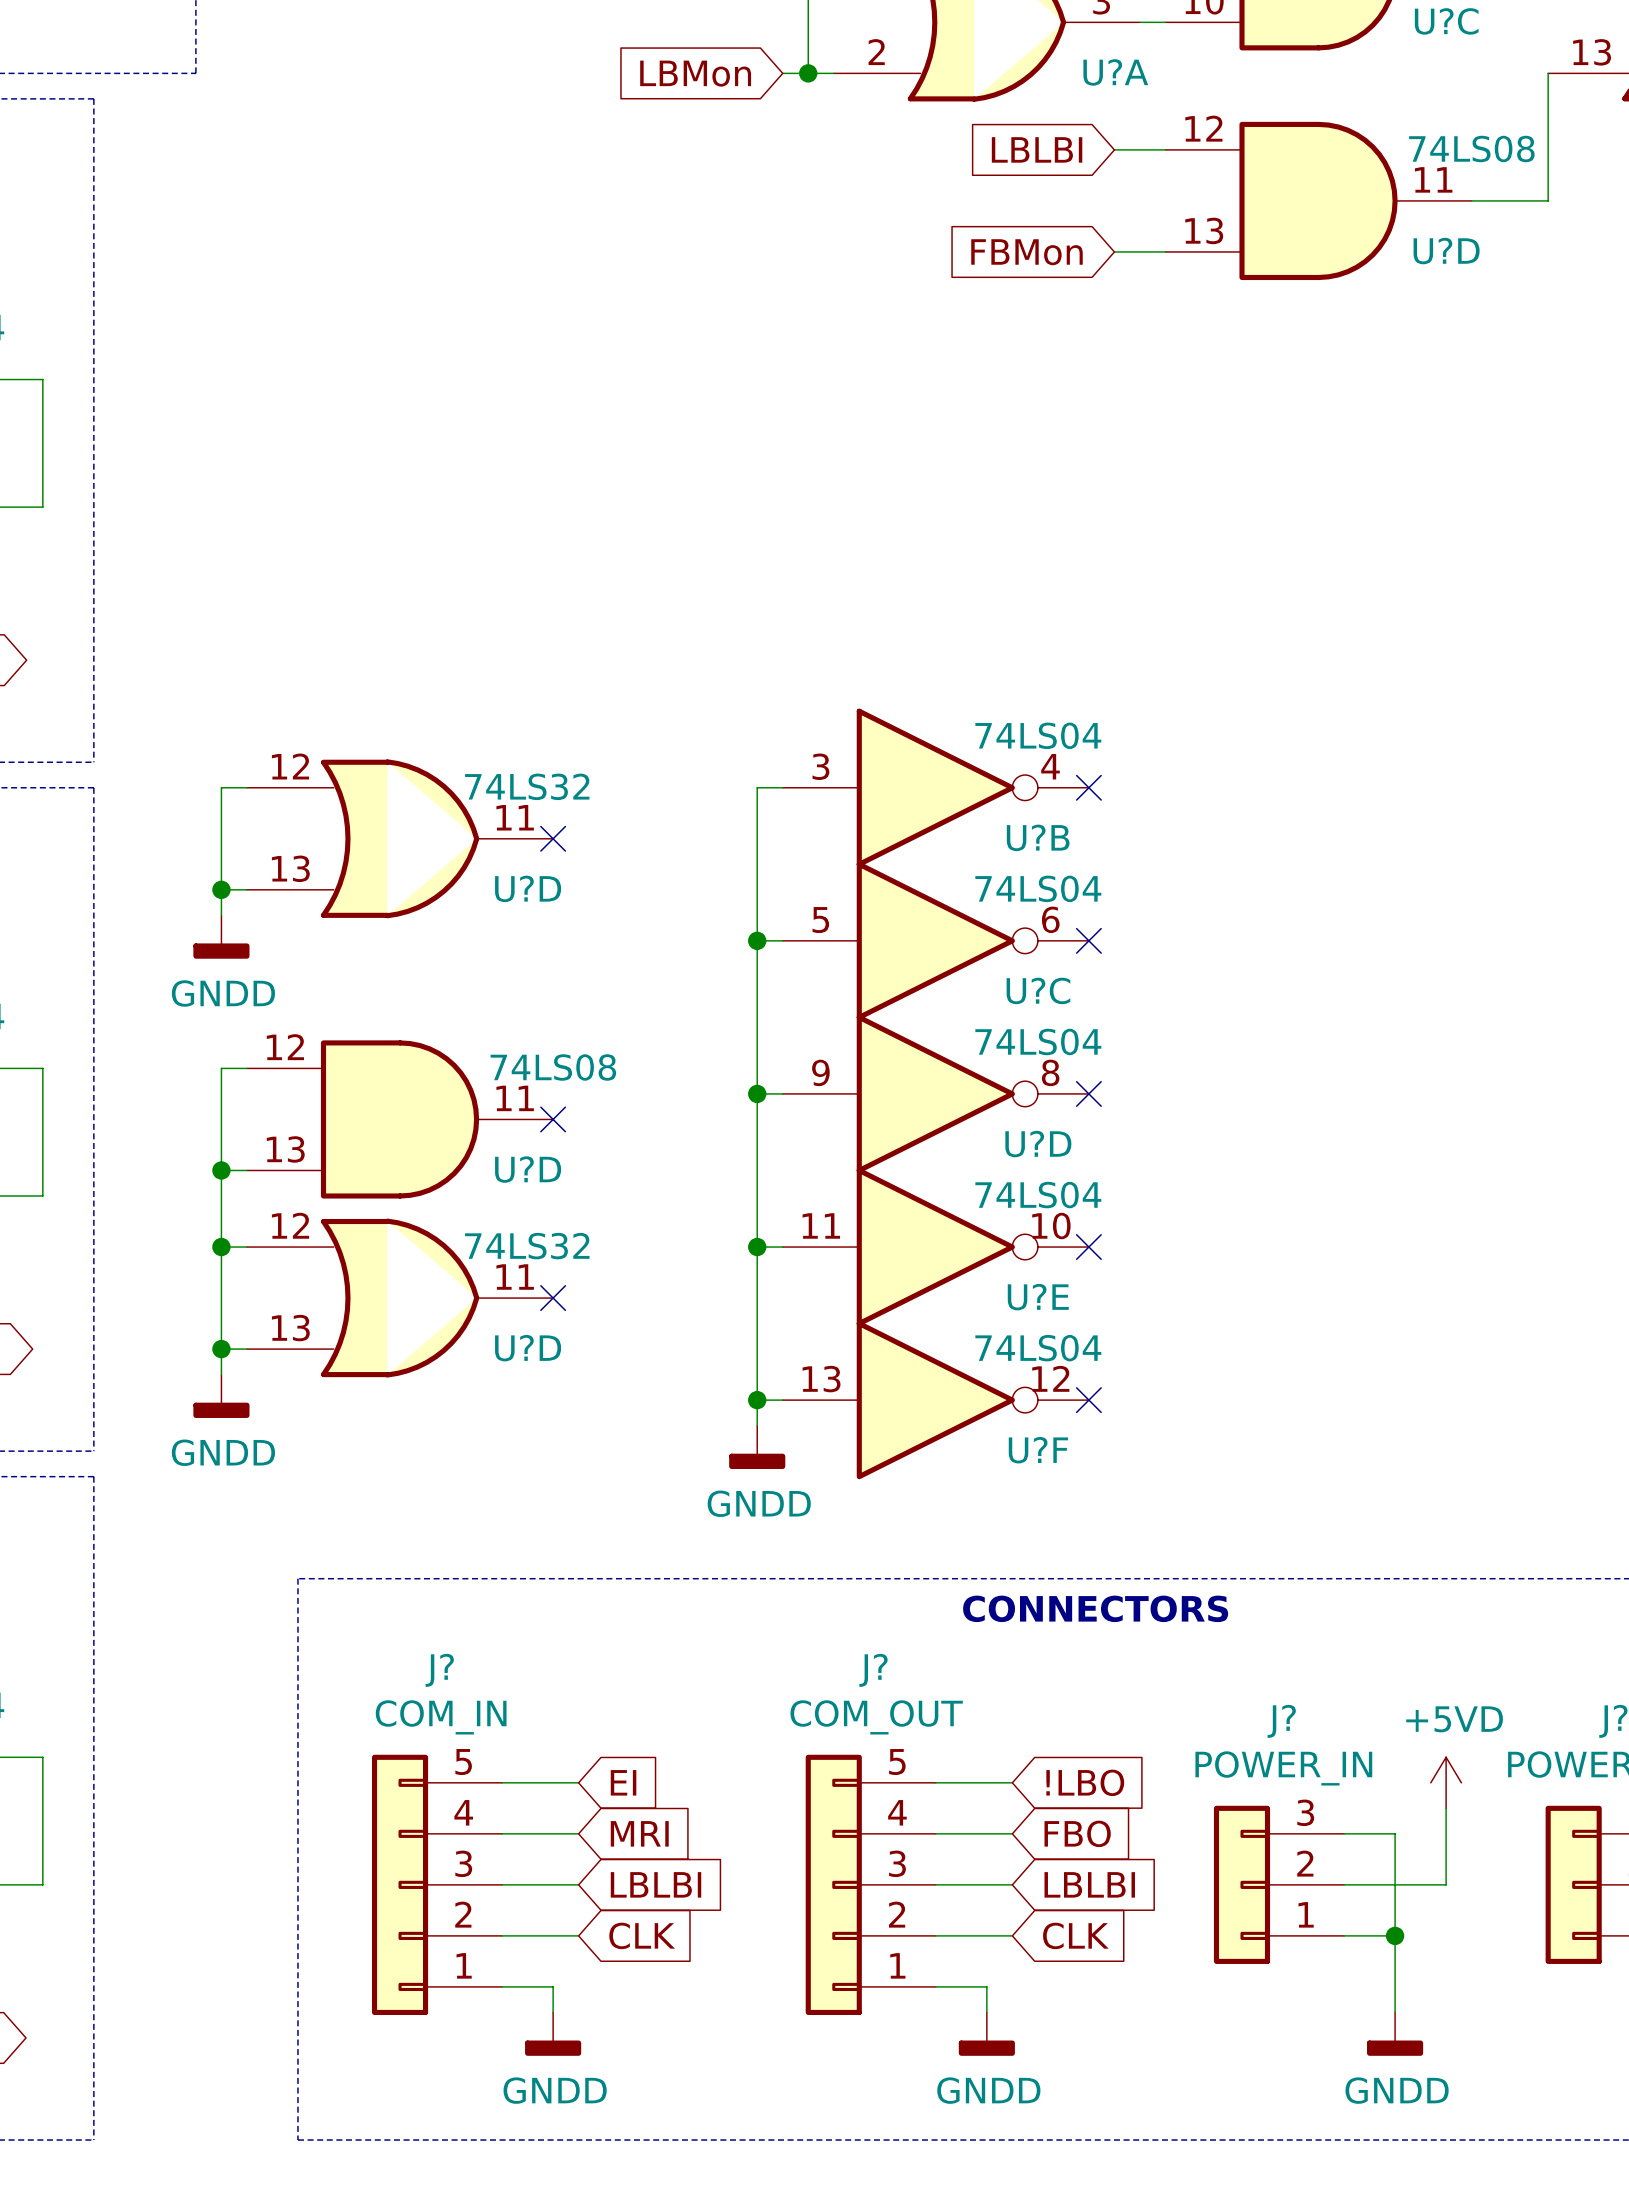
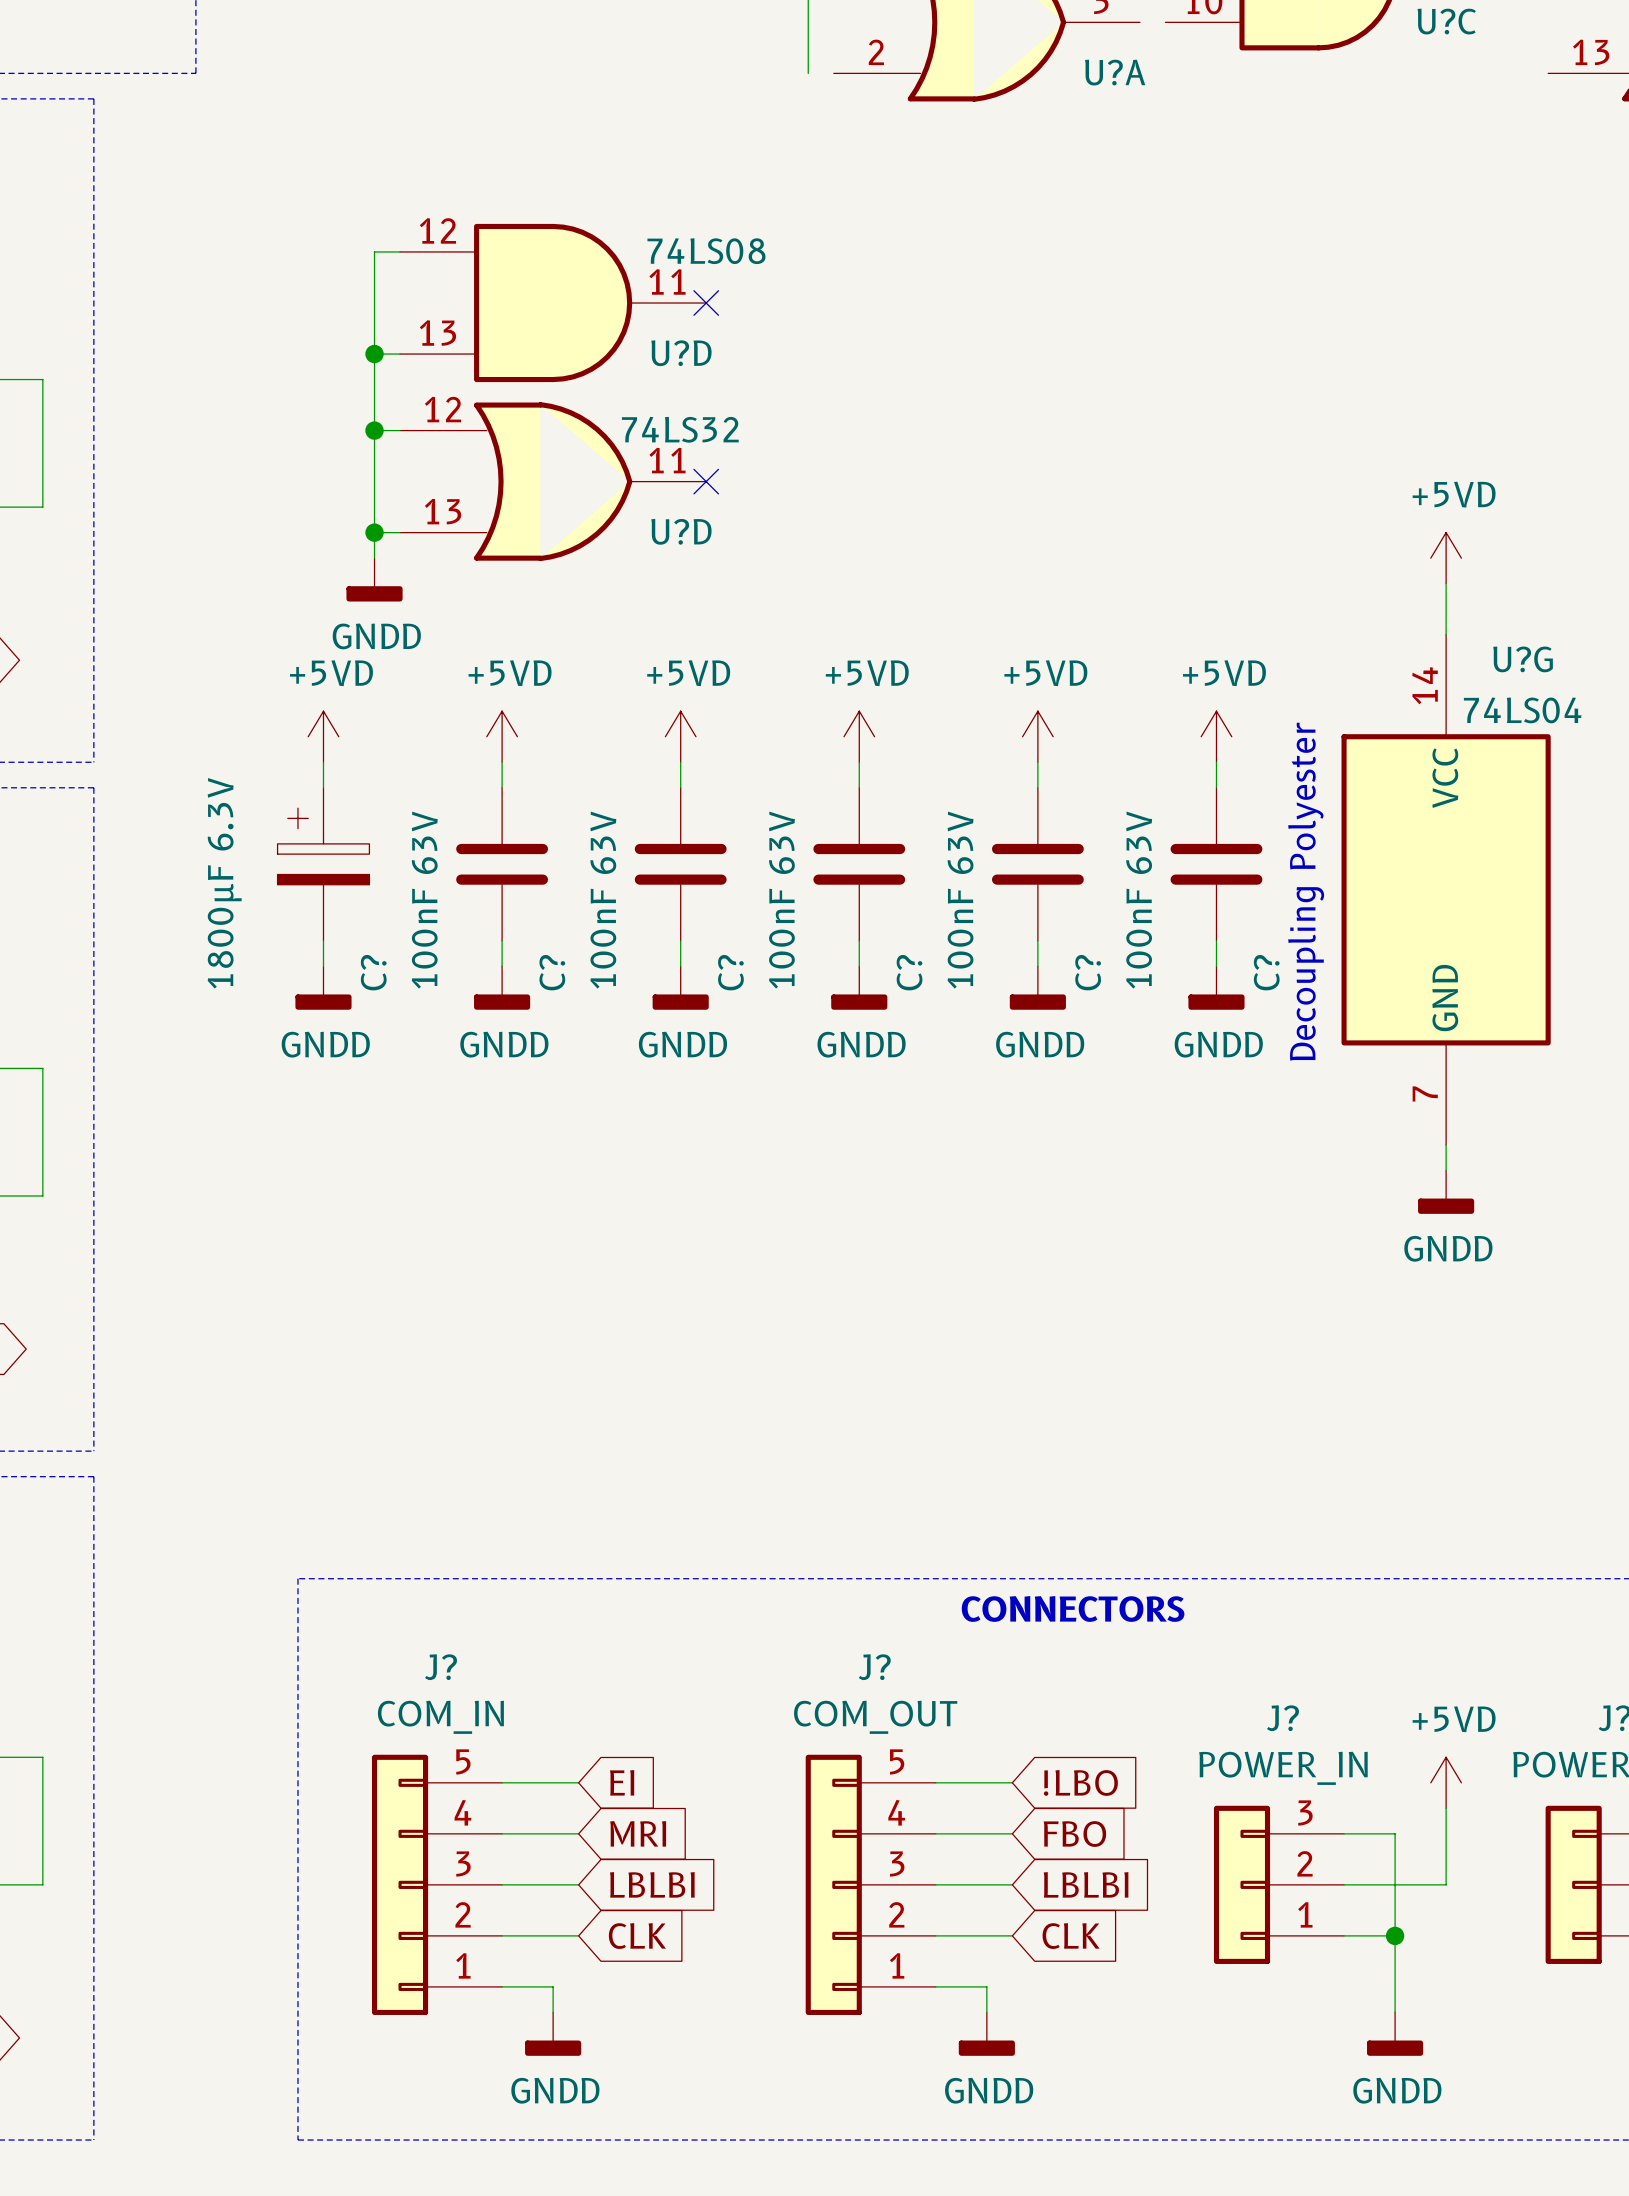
wire: (1139, 22) (1165, 22) -> none
global label: LBMon (695, 73) -> none
wire: (782, 73) (833, 73) -> none
junction: (808, 73) -> none
wire: (1548, 73) (1548, 200) (1471, 200) -> none
global label: LBLBI (1037, 149) -> none
wire: (1114, 149) (1165, 149) -> none
U?D: 74LS08 (1318, 200) -> none
wire: none -> (400, 251) (374, 251) (374, 558)
wire: (1114, 251) (1165, 251) -> none
global label: FBMon (1026, 252) -> none
U?D: none -> 74LS08 (553, 303)
no-connect mark: none -> (706, 303)
wire: none -> (374, 354) (400, 354)
junction: none -> (374, 354)
wire: none -> (374, 430) (400, 430)
junction: none -> (374, 430)
no-connect mark: none -> (706, 481)
junction: none -> (374, 532)
power symbol: none -> +5VD (1446, 558)
power symbol: none -> GNDD (374, 579)
wire: none -> (1446, 583) (1446, 634)
power symbol: none -> +5VD (323, 736)
power symbol: none -> +5VD (502, 736)
power symbol: none -> +5VD (680, 736)
power symbol: none -> +5VD (859, 736)
power symbol: none -> +5VD (1037, 736)
power symbol: none -> +5VD (1216, 736)
wire: none -> (323, 762) (323, 787)
wire: none -> (502, 762) (502, 787)
wire: none -> (680, 762) (680, 787)
wire: none -> (1037, 762) (1037, 787)
wire: none -> (1216, 762) (1216, 787)
wire: (246, 787) (221, 787) (221, 915) -> none
wire: (782, 787) (757, 787) (757, 1425) -> none
U?B: 74LS04 (935, 787) -> none
no-connect mark: (1088, 787) -> none
U?D position: (400, 838) -> (553, 481)
no-connect mark: (553, 838) -> none
C?: none -> 1800µF 6.3V (323, 864)
C?: none -> 100nF 63V (502, 864)
C?: none -> 100nF 63V (680, 864)
C?: none -> 100nF 63V (859, 864)
C?: none -> 100nF 63V (1037, 864)
C?: none -> 100nF 63V (1216, 864)
text: none -> Decoupling Polyester (1306, 891)
wire: (221, 889) (246, 889) -> (374, 532) (400, 532)
junction: (221, 889) -> none
U?G: none -> 74LS04 (1446, 889)
power symbol position: GNDD (221, 937) -> GNDD (323, 988)
wire: none -> (323, 940) (323, 966)
wire: none -> (502, 940) (502, 966)
wire: none -> (680, 940) (680, 966)
wire: (757, 940) (782, 940) -> none
junction: (757, 940) -> none
U?C: 74LS04 (935, 940) -> none
wire: none -> (1037, 940) (1037, 966)
no-connect mark: (1088, 940) -> none
wire: none -> (1216, 940) (1216, 966)
power symbol: none -> GNDD (502, 988)
power symbol: none -> GNDD (680, 988)
power symbol: none -> GNDD (859, 988)
power symbol: none -> GNDD (1037, 988)
power symbol: none -> GNDD (1216, 988)
wire: (246, 1068) (221, 1068) (221, 1374) -> none
wire: (757, 1093) (782, 1093) -> none
junction: (757, 1093) -> none
U?D: 74LS04 (935, 1093) -> none
no-connect mark: (1088, 1093) -> none
U?D: 74LS08 (400, 1119) -> none
no-connect mark: (553, 1119) -> none
wire: none -> (1446, 1144) (1446, 1170)
wire: (221, 1170) (246, 1170) -> none
junction: (221, 1170) -> none
power symbol: none -> GNDD (1446, 1192)
wire: (221, 1247) (246, 1247) -> none
junction: (221, 1247) -> none
wire: (757, 1247) (782, 1247) -> none
junction: (757, 1247) -> none
U?E: 74LS04 (935, 1247) -> none
no-connect mark: (1088, 1247) -> none
U?D: 74LS32 (400, 1298) -> none
no-connect mark: (553, 1298) -> none
wire: (221, 1349) (246, 1349) -> none
junction: (221, 1349) -> none
power symbol: GNDD (221, 1396) -> none
wire: (757, 1400) (782, 1400) -> none
junction: (757, 1400) -> none
U?F: 74LS04 (935, 1400) -> none
no-connect mark: (1088, 1400) -> none
power symbol: GNDD (757, 1447) -> none

